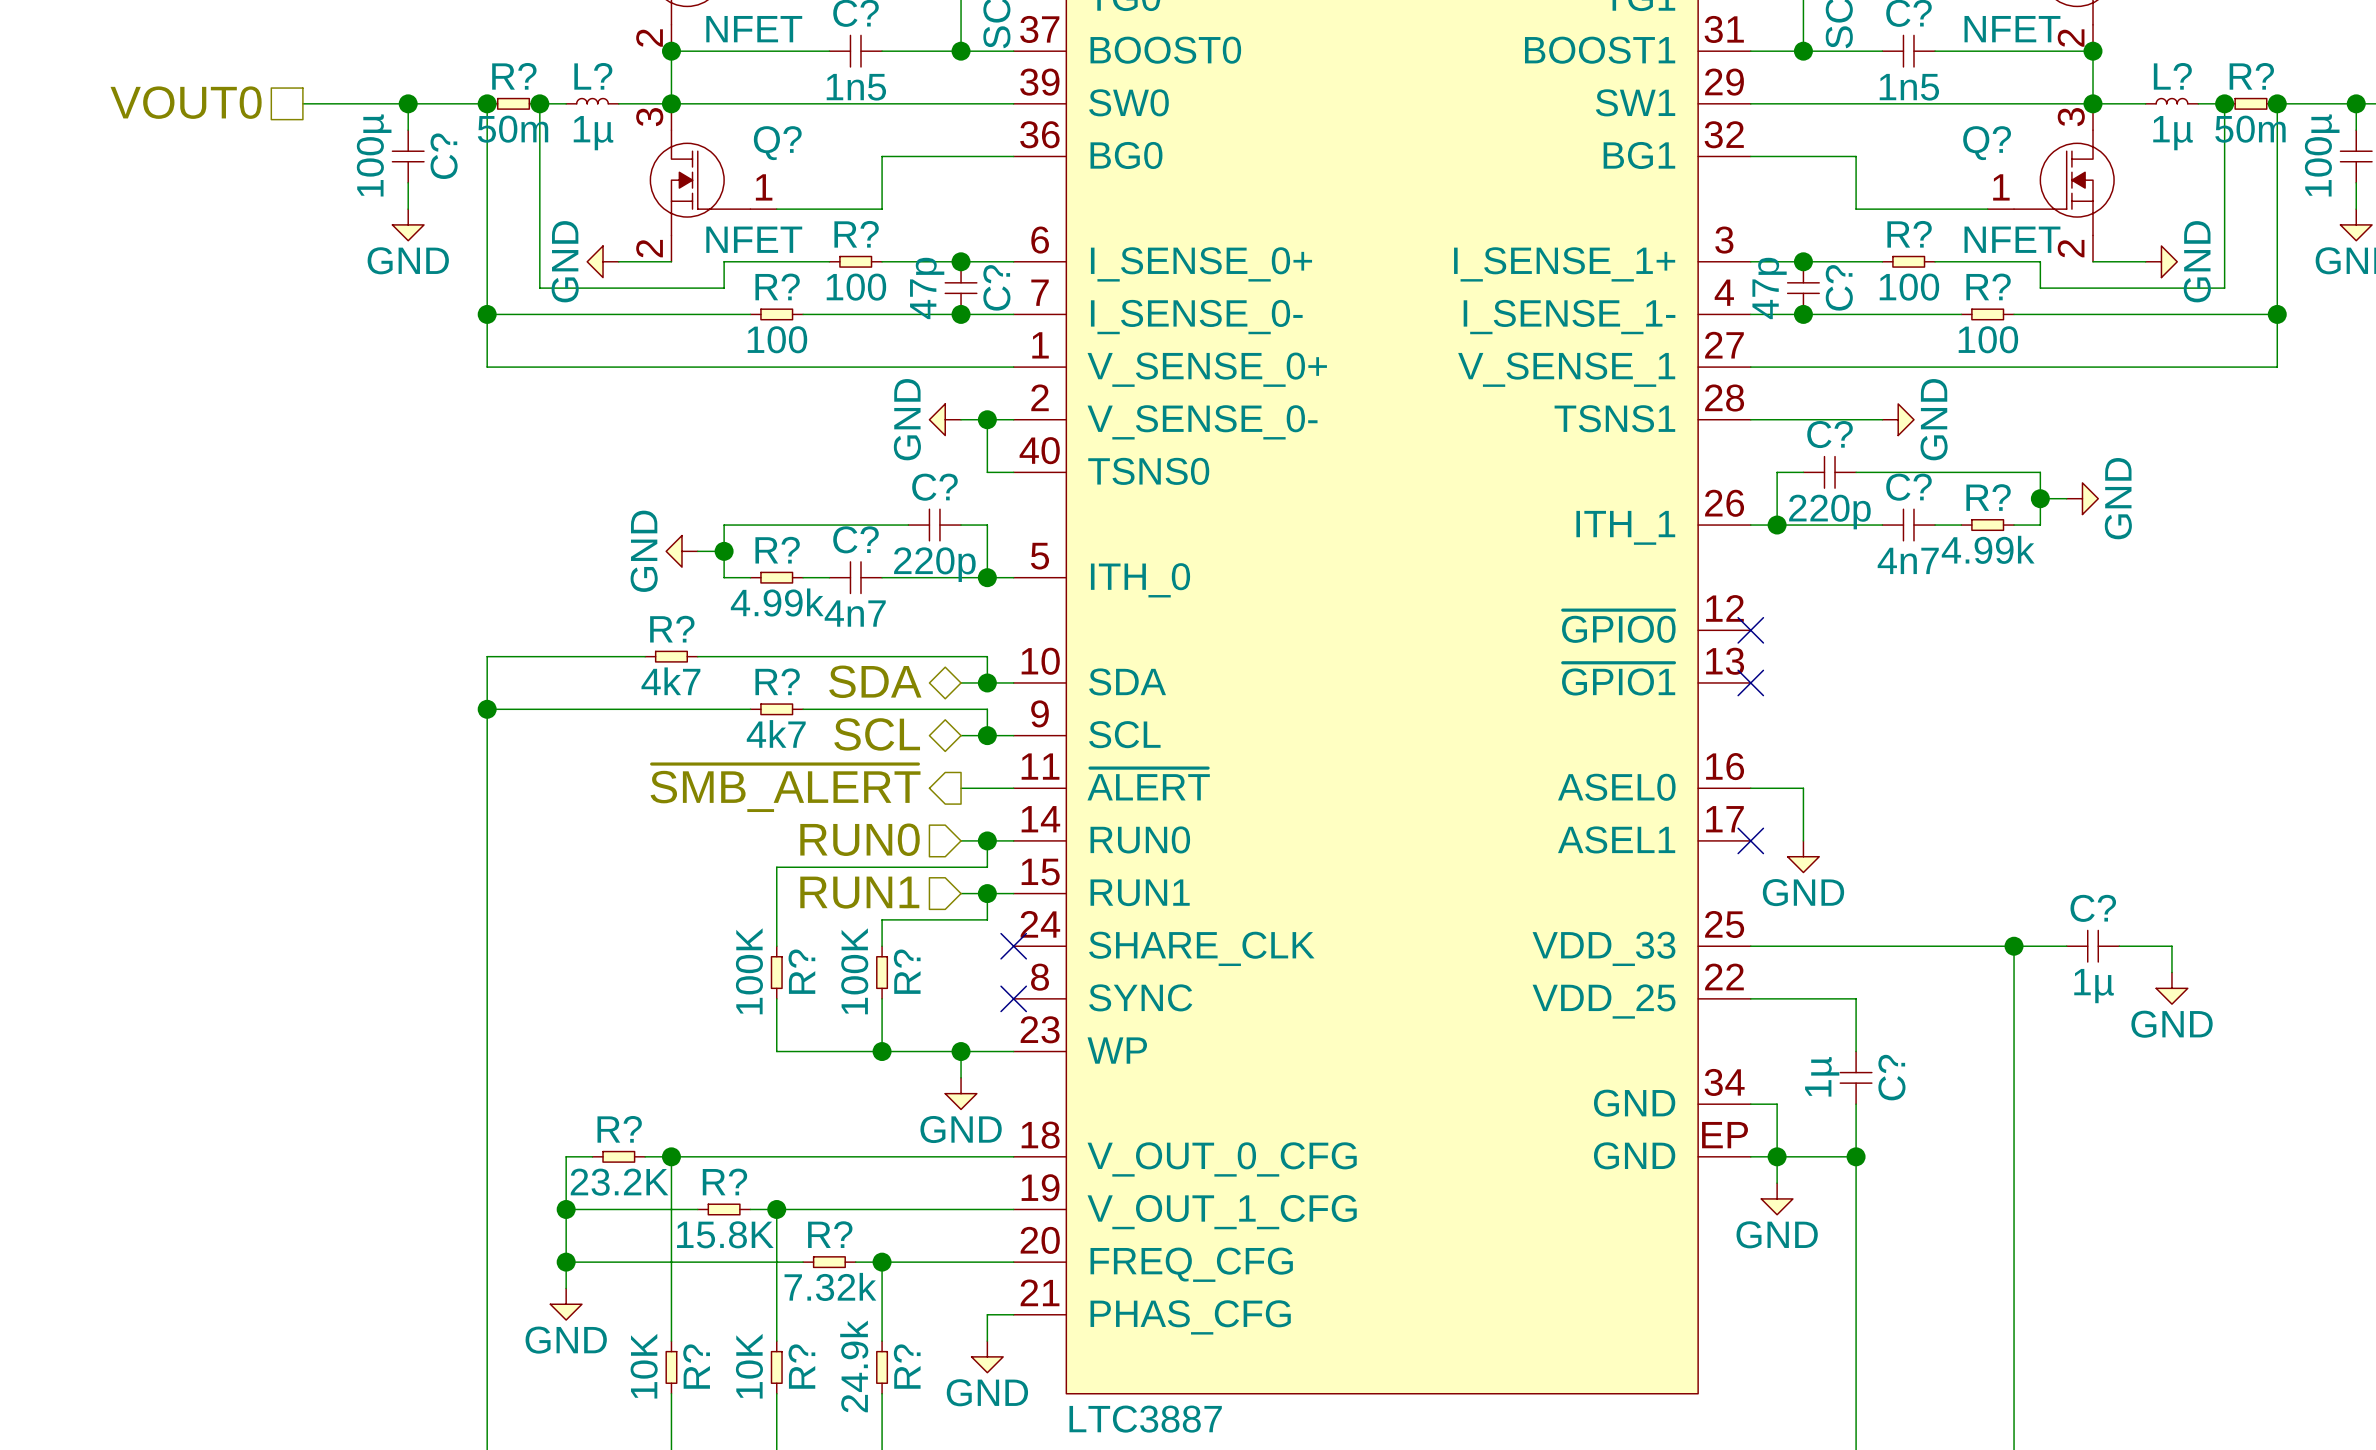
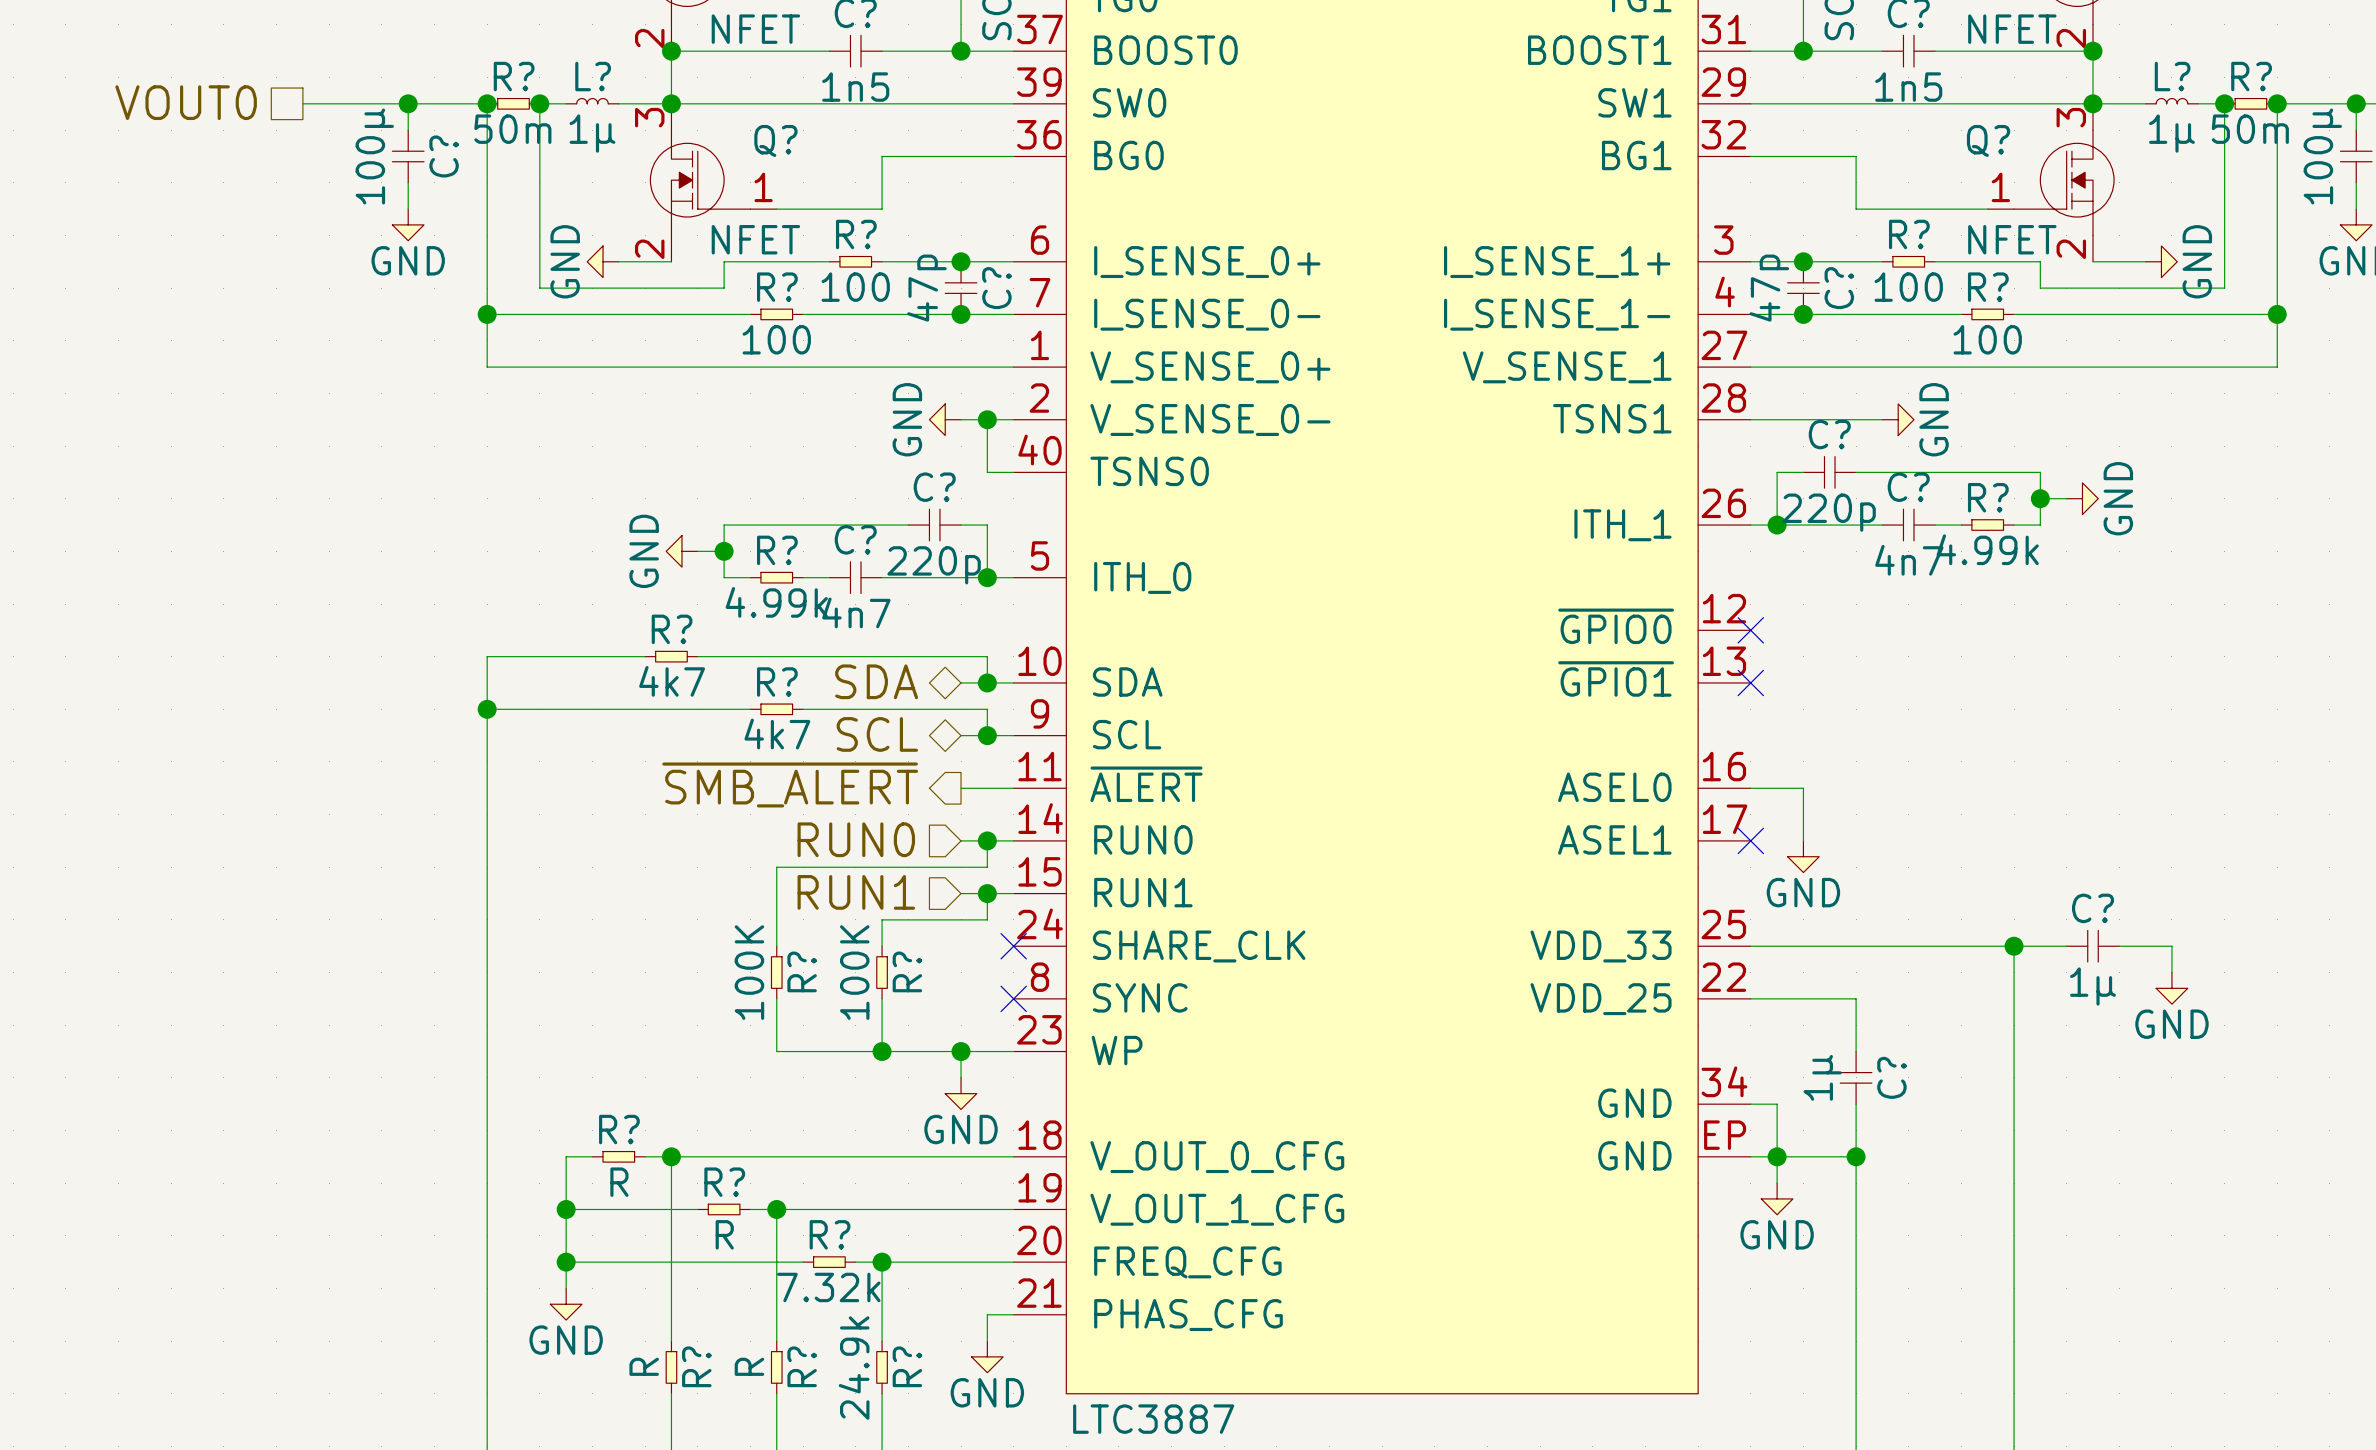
R? value: 23.2K (619, 1182) -> R (619, 1182)
R? value: 15.8K (725, 1234) -> R (724, 1234)
R? value: 10K (644, 1366) -> R (644, 1366)
R? value: 10K (749, 1366) -> R (749, 1366)

